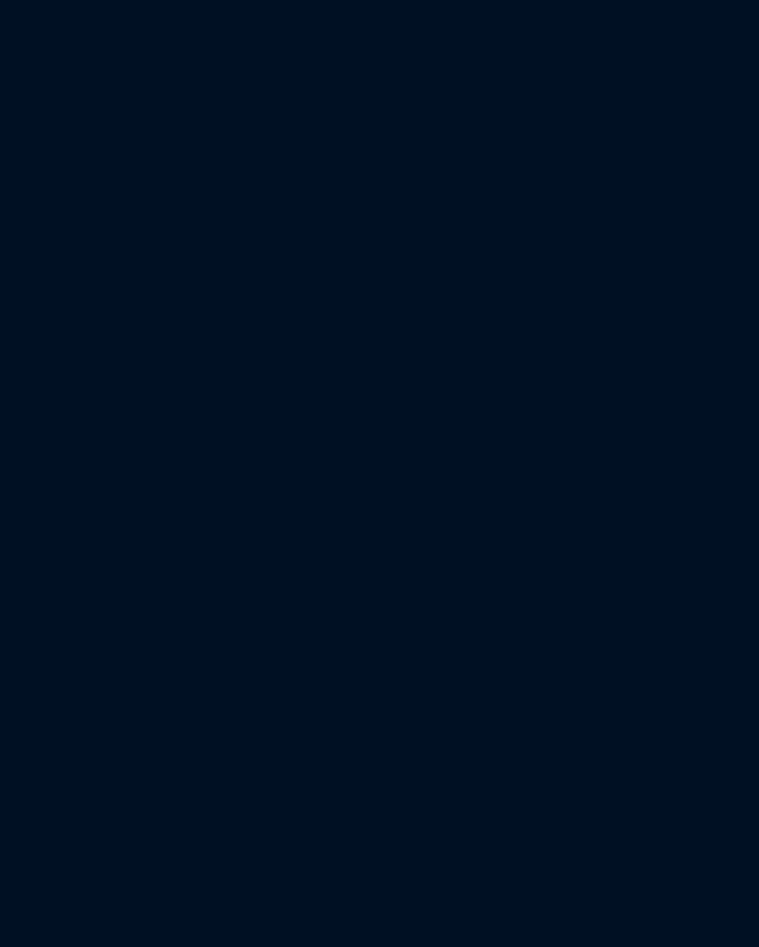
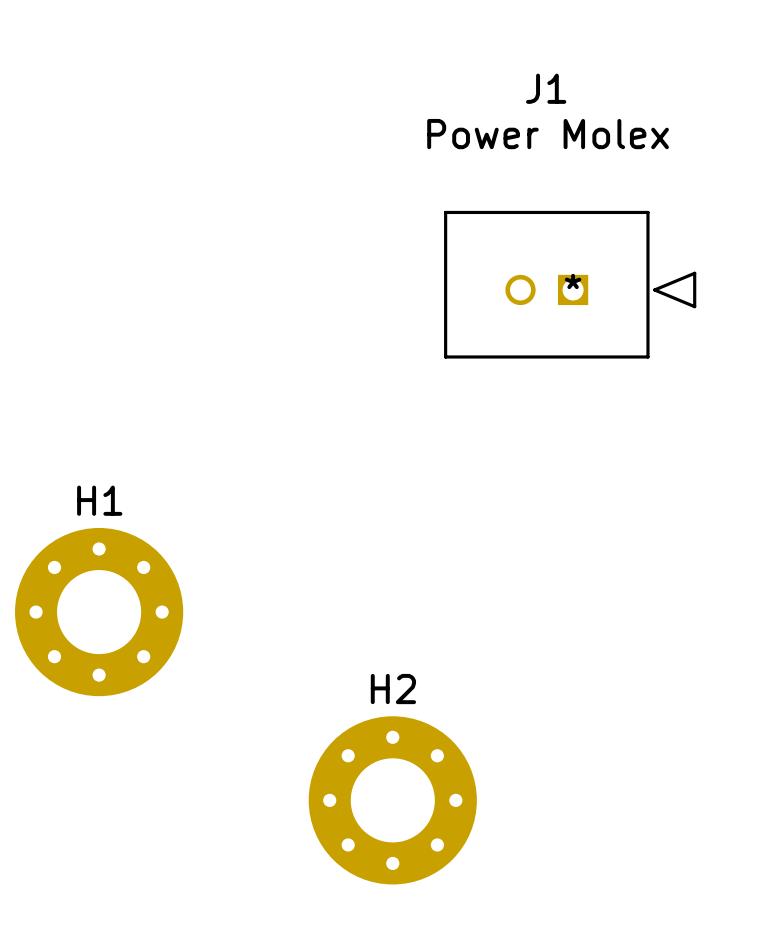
J1: none -> Power Molex (570, 284)
H1: none -> (99, 612)
H2: none -> (392, 800)

